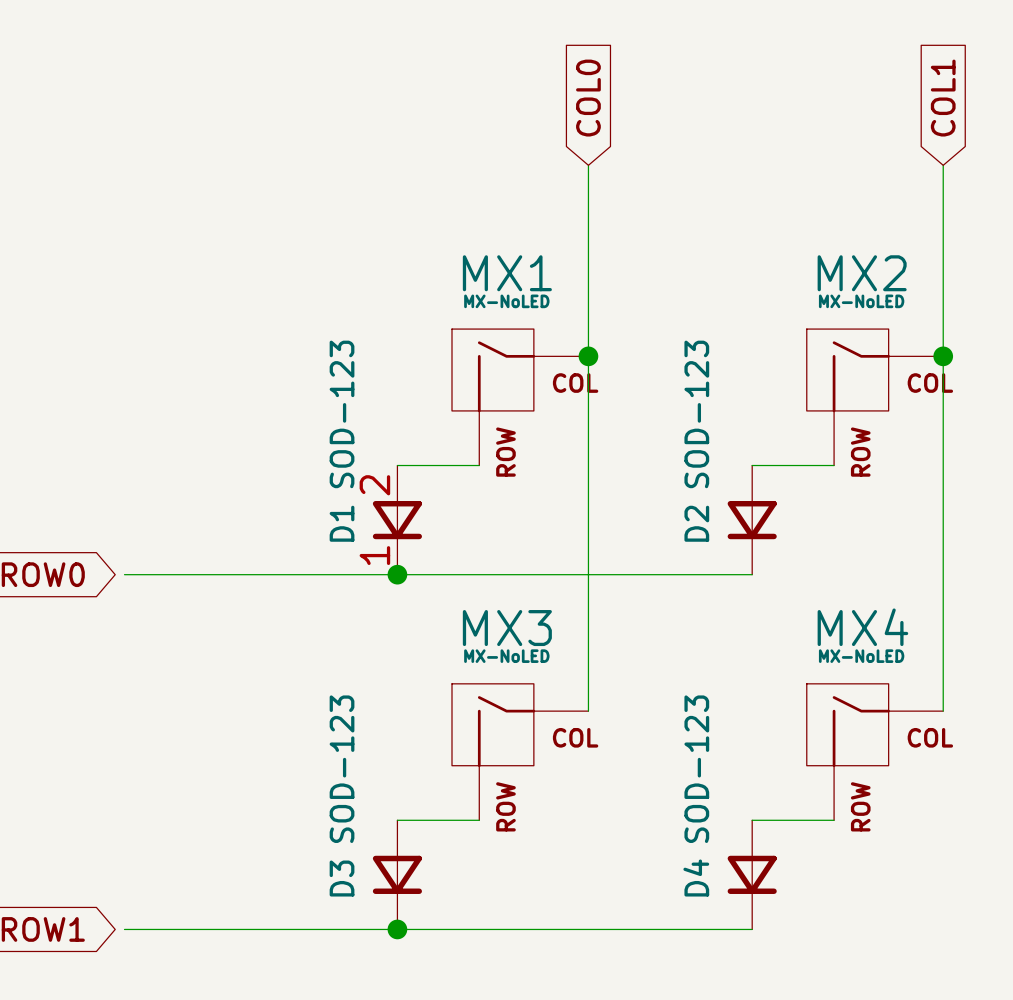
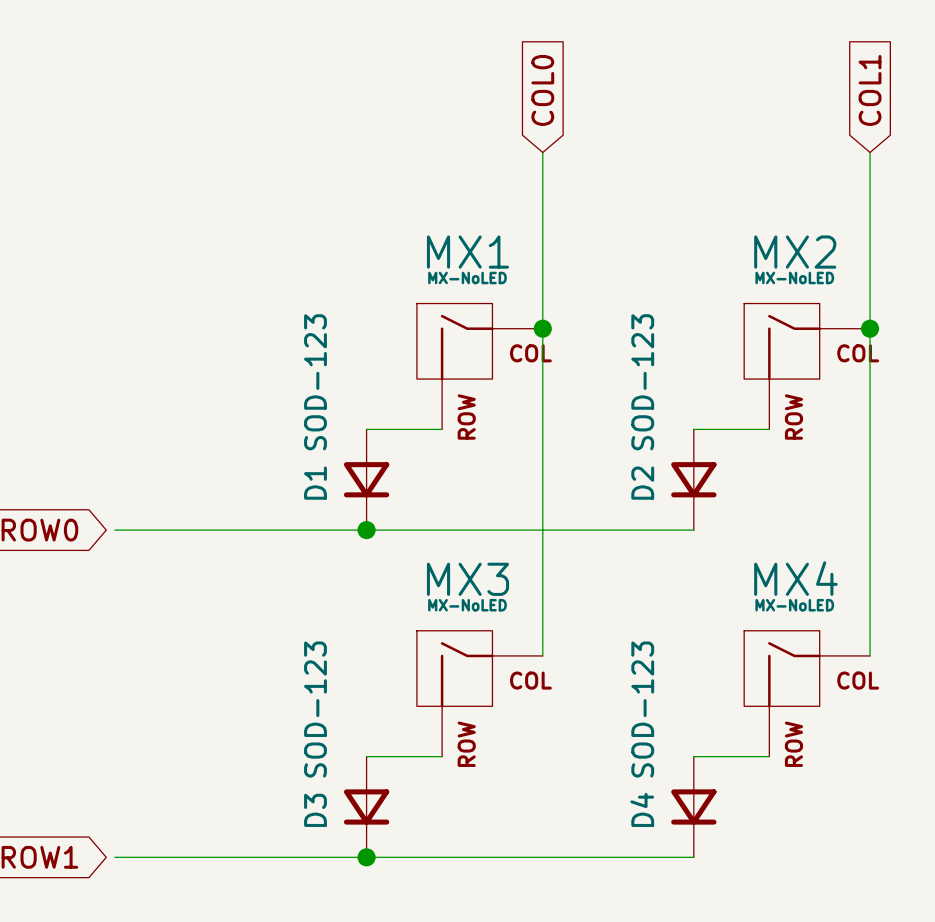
D1 pin number: 2 (374, 485) -> none
D1 pin number: 1 (374, 555) -> none

